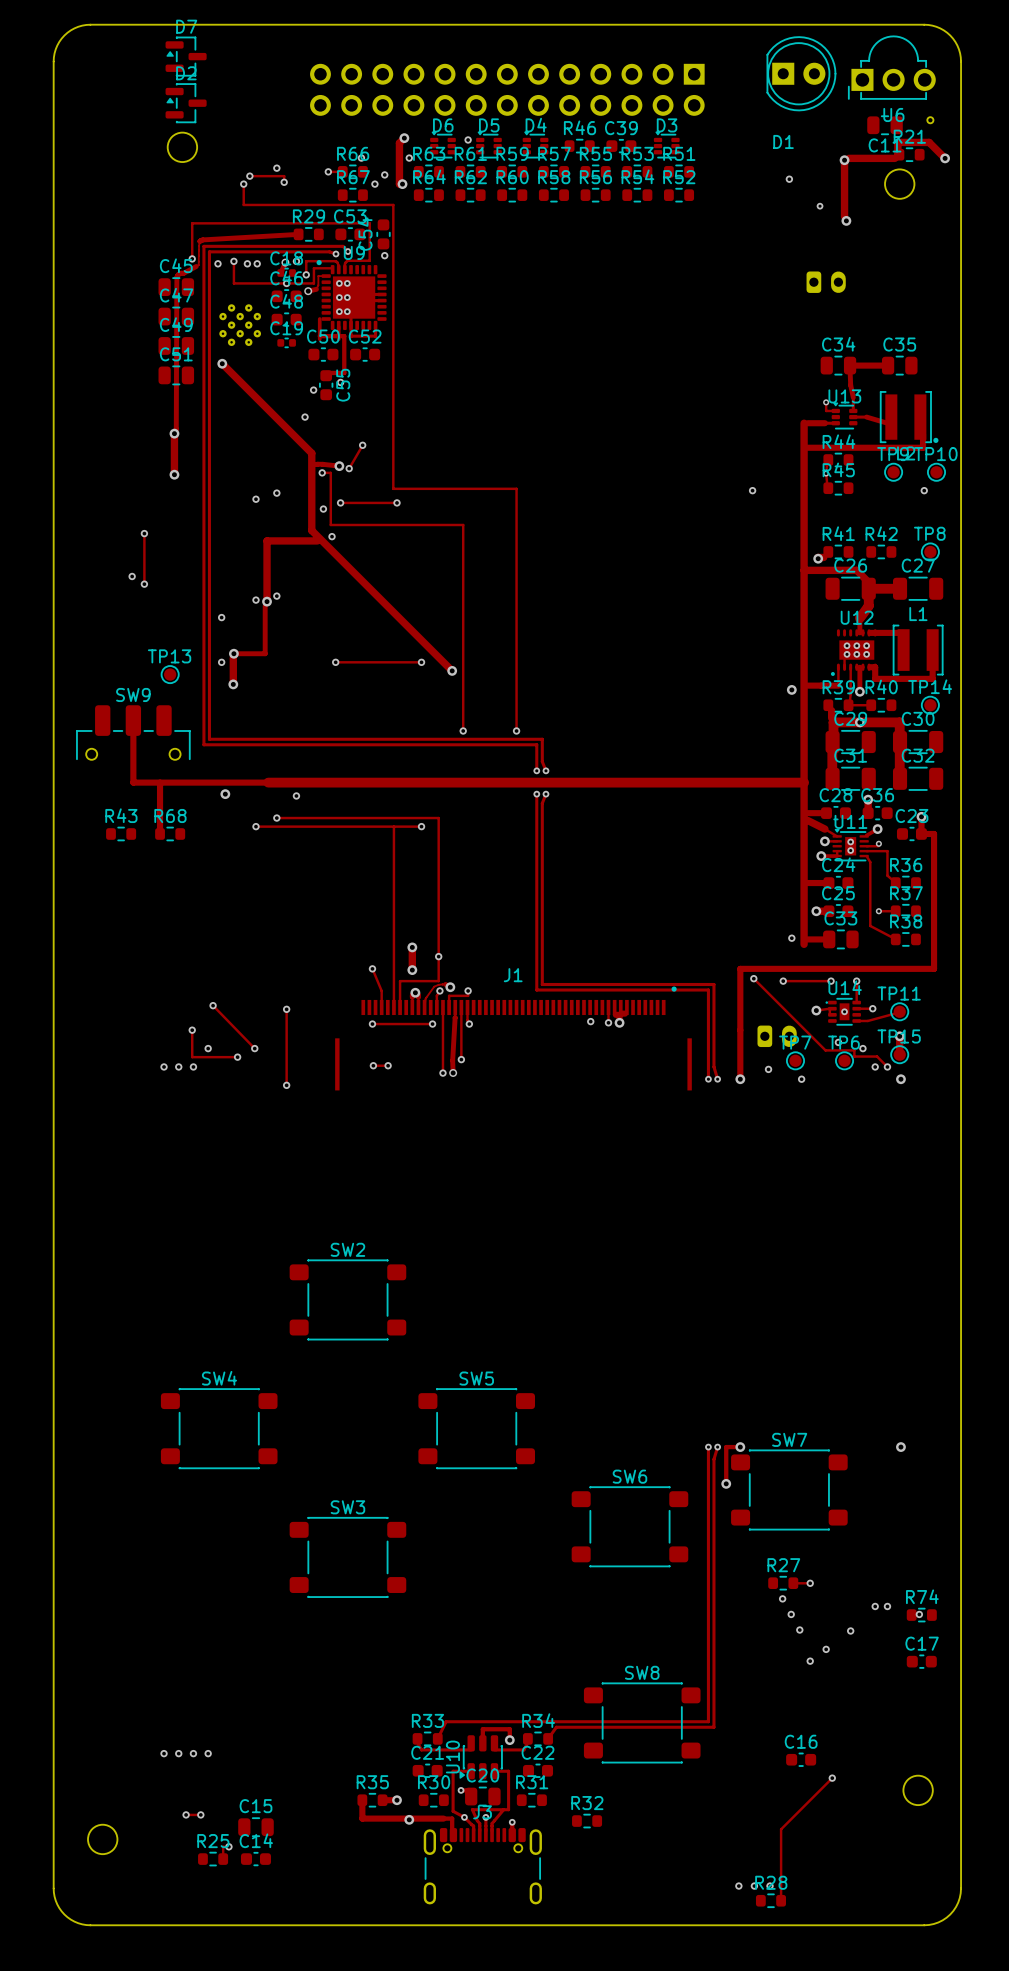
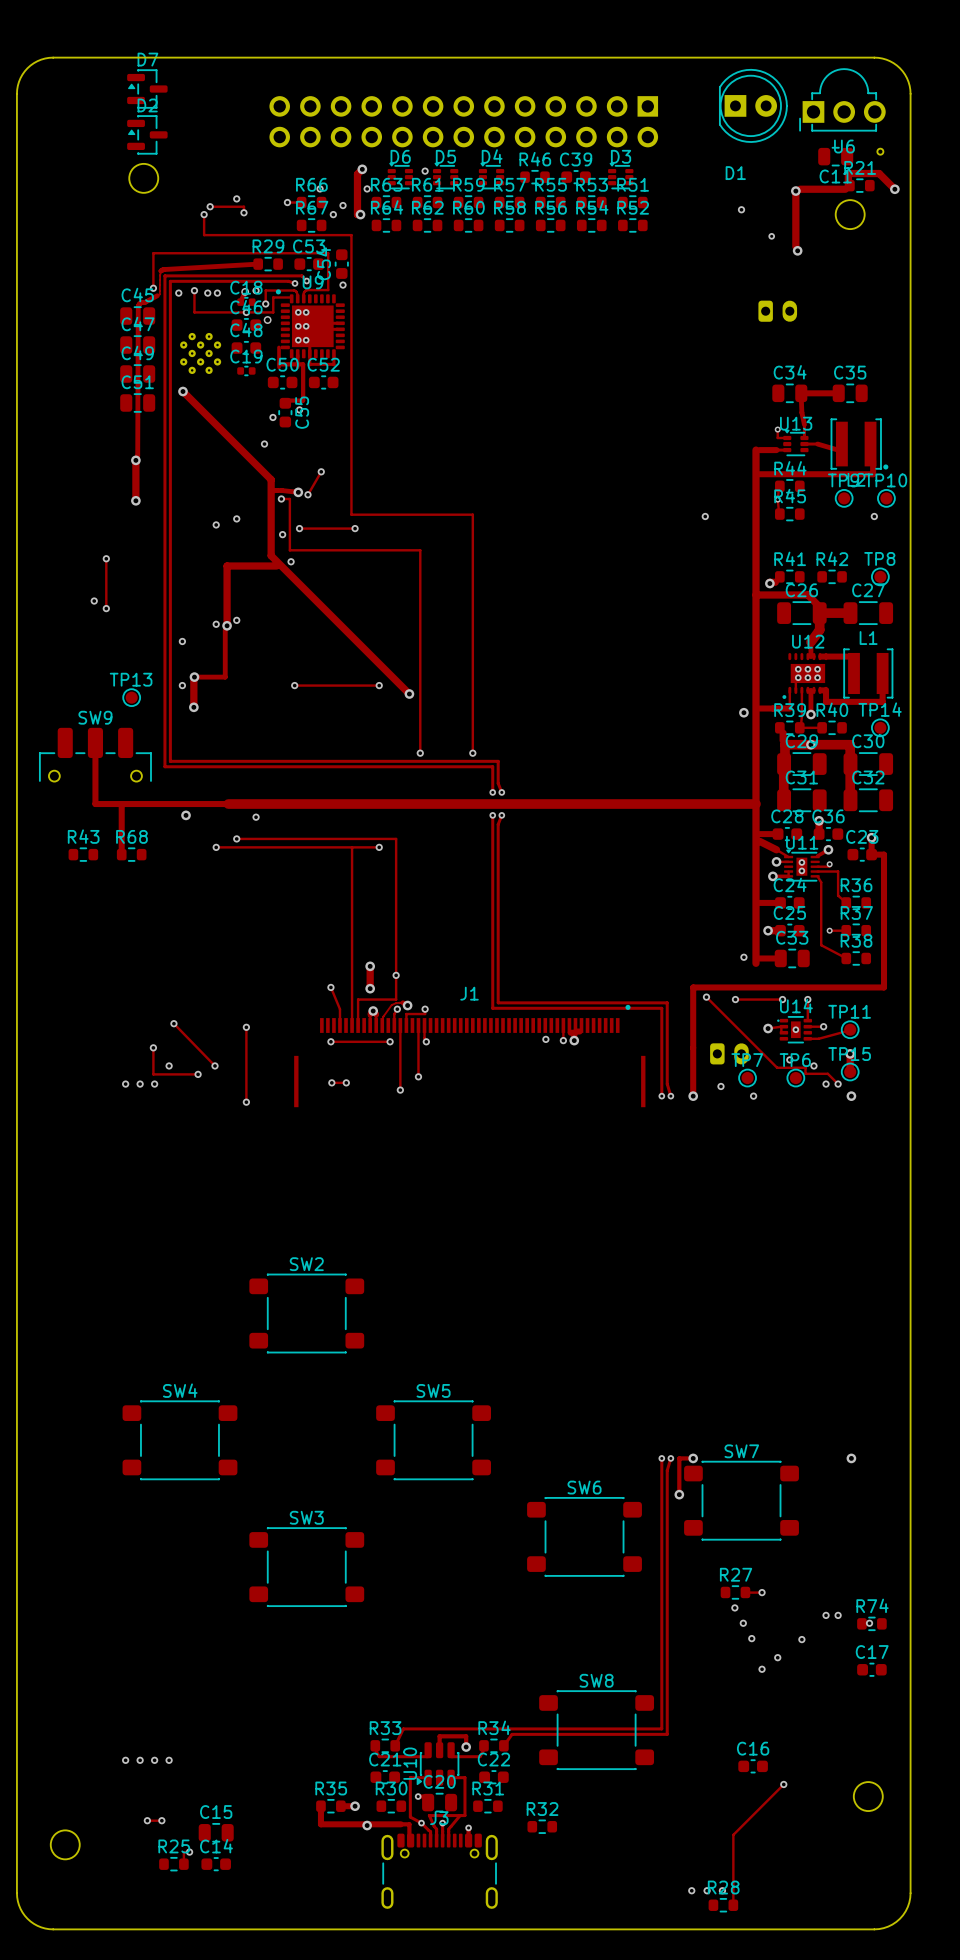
track: (324, 276) (318, 276) (316, 289) (308, 291) -> none
track: (455, 1017) (453, 1072) -> none
via: (453, 1072) -> none

